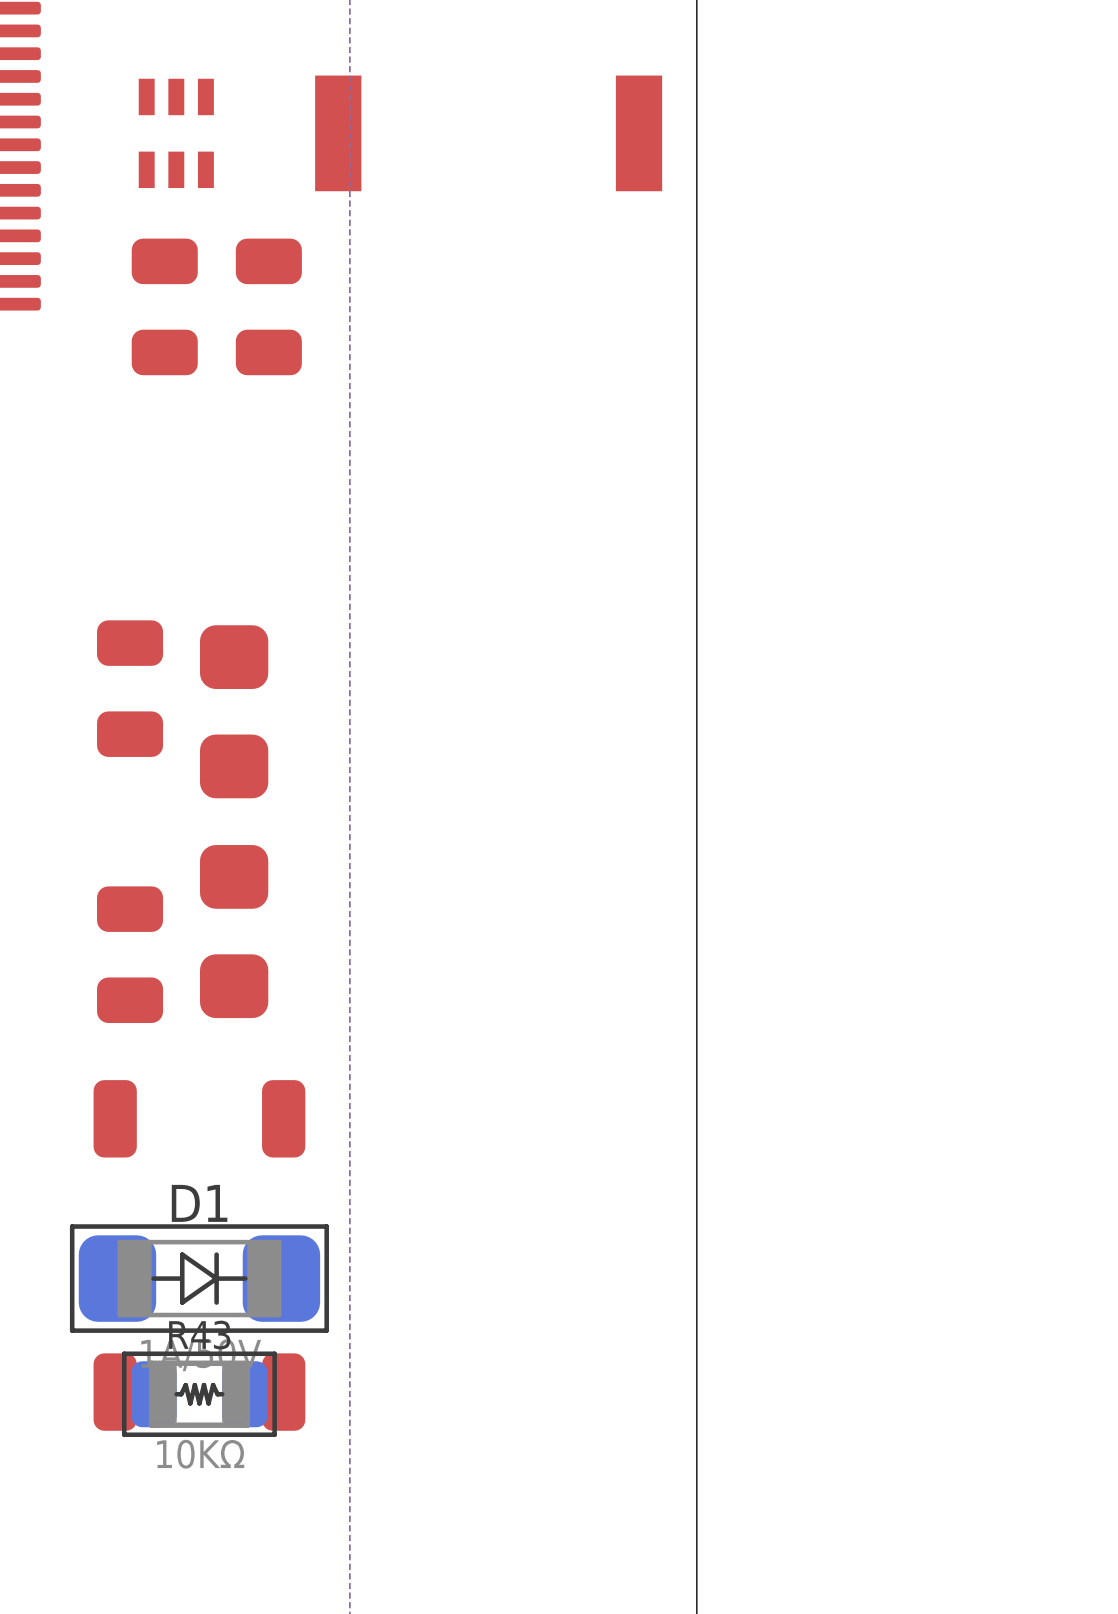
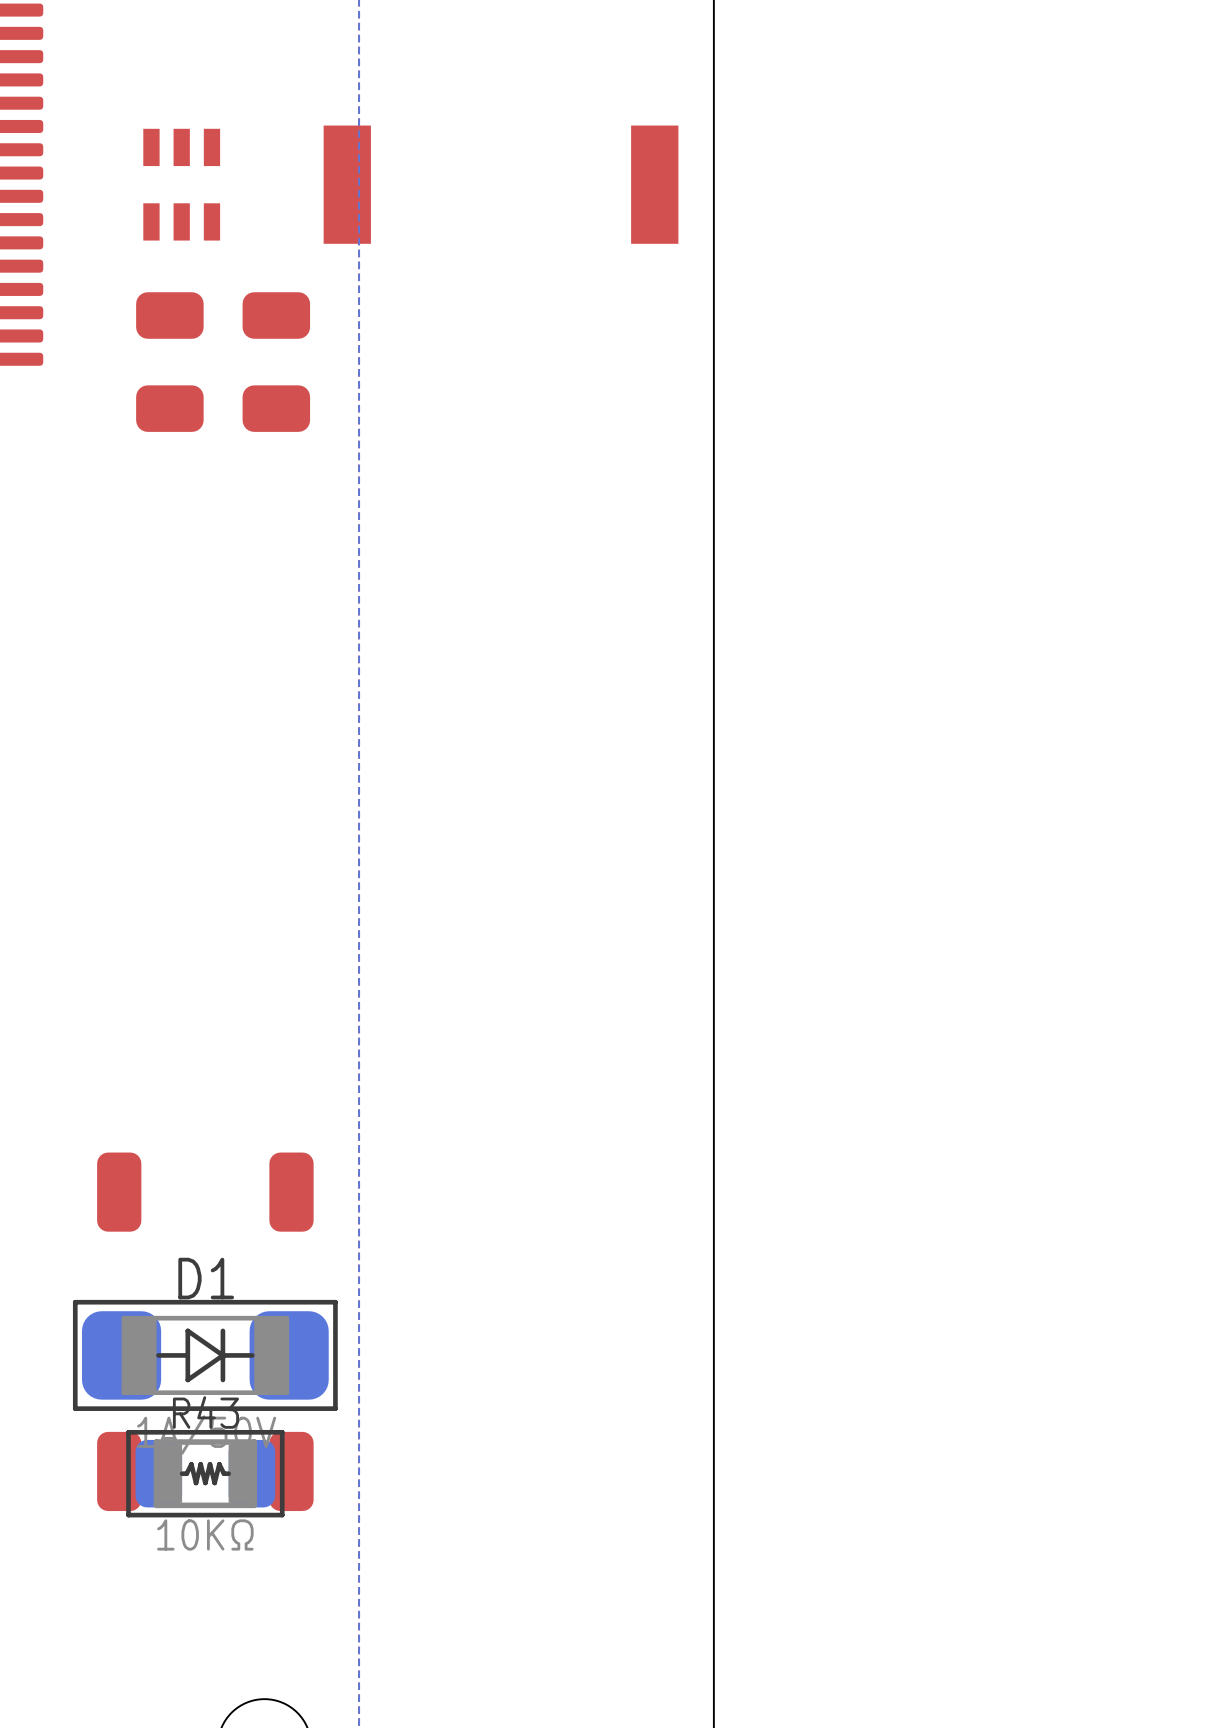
part: (130, 688) -> none
part: (234, 711) -> none
part: (234, 931) -> none
part: (130, 954) -> none

